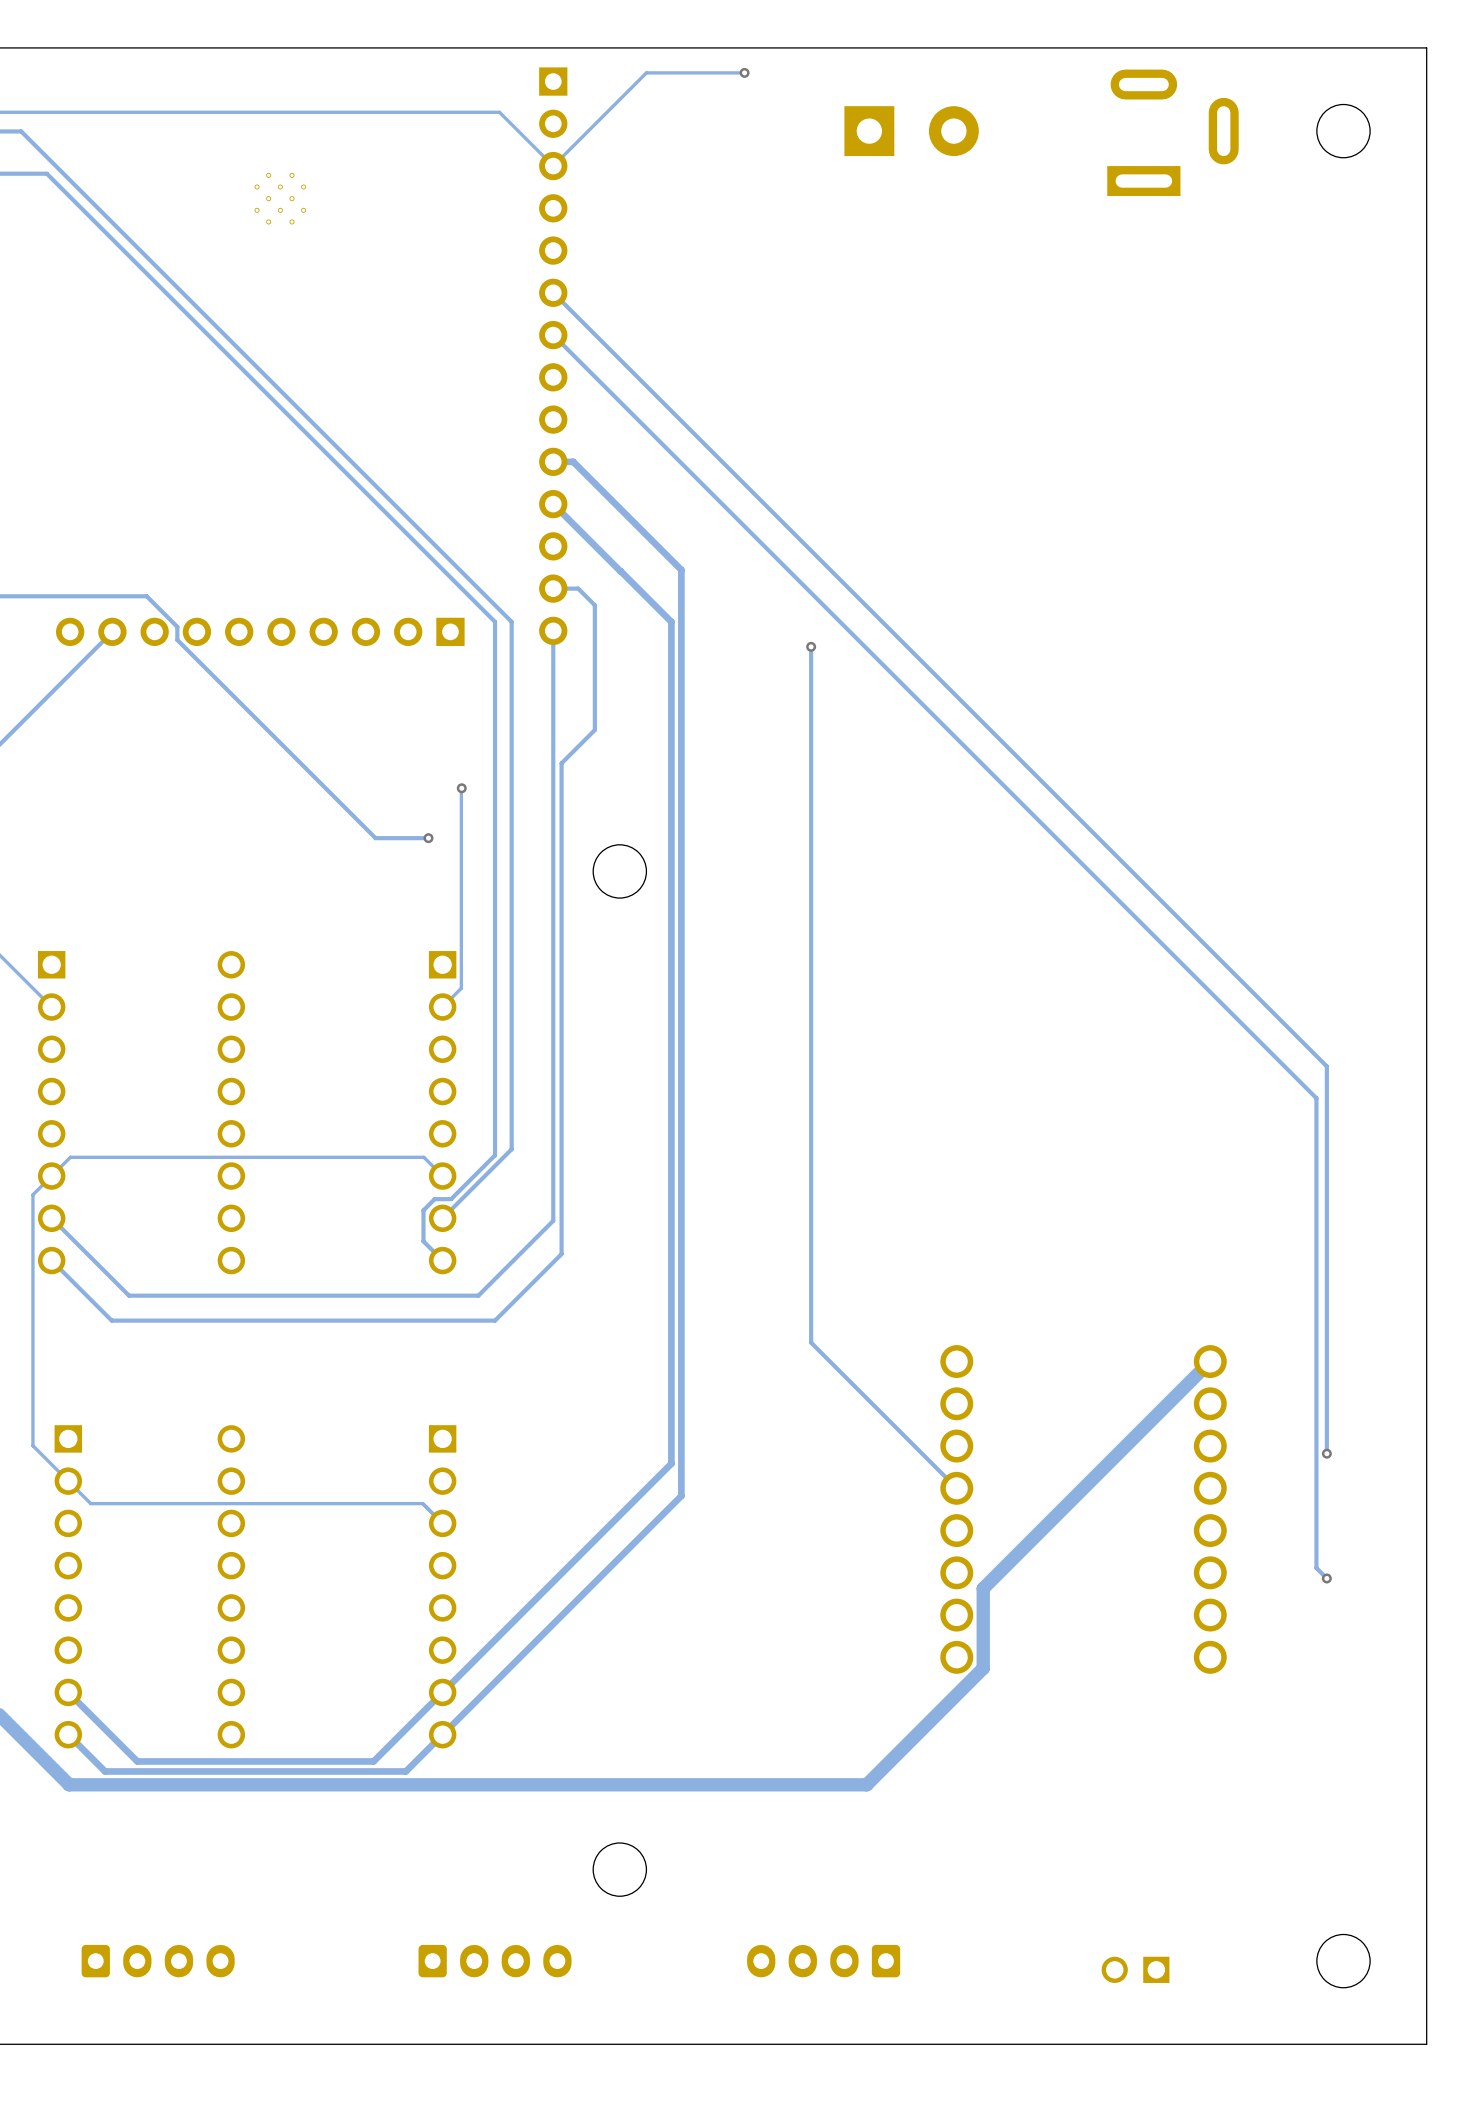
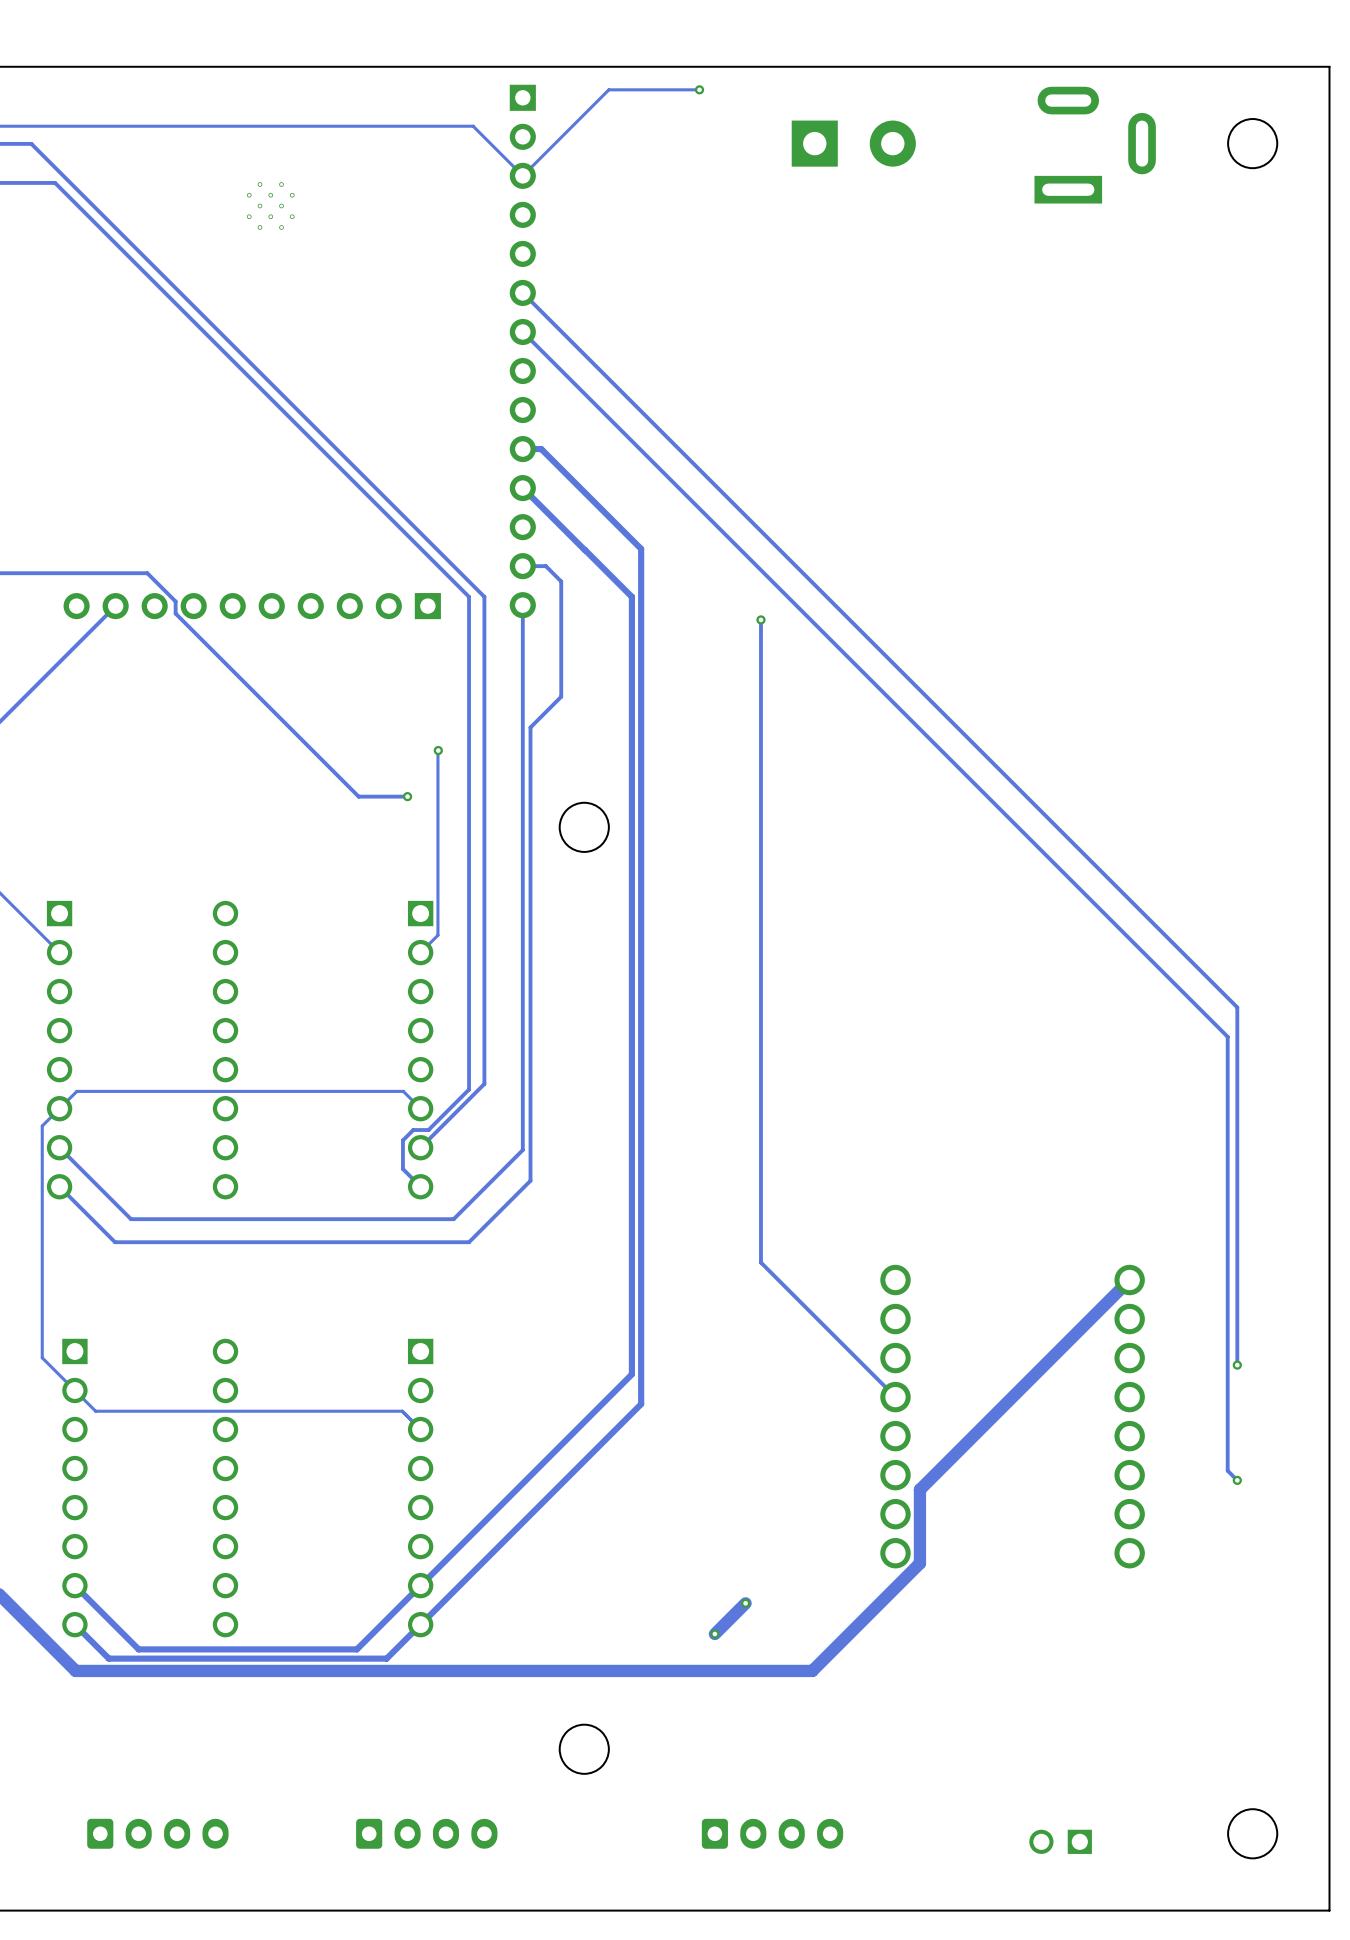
track: none -> (745, 1603) (714, 1634)
via: none -> (745, 1603)
via: none -> (714, 1634)
part position: (495, 1961) -> (426, 1833)
part rotation: 0° (823, 1961) -> 180° (772, 1833)

